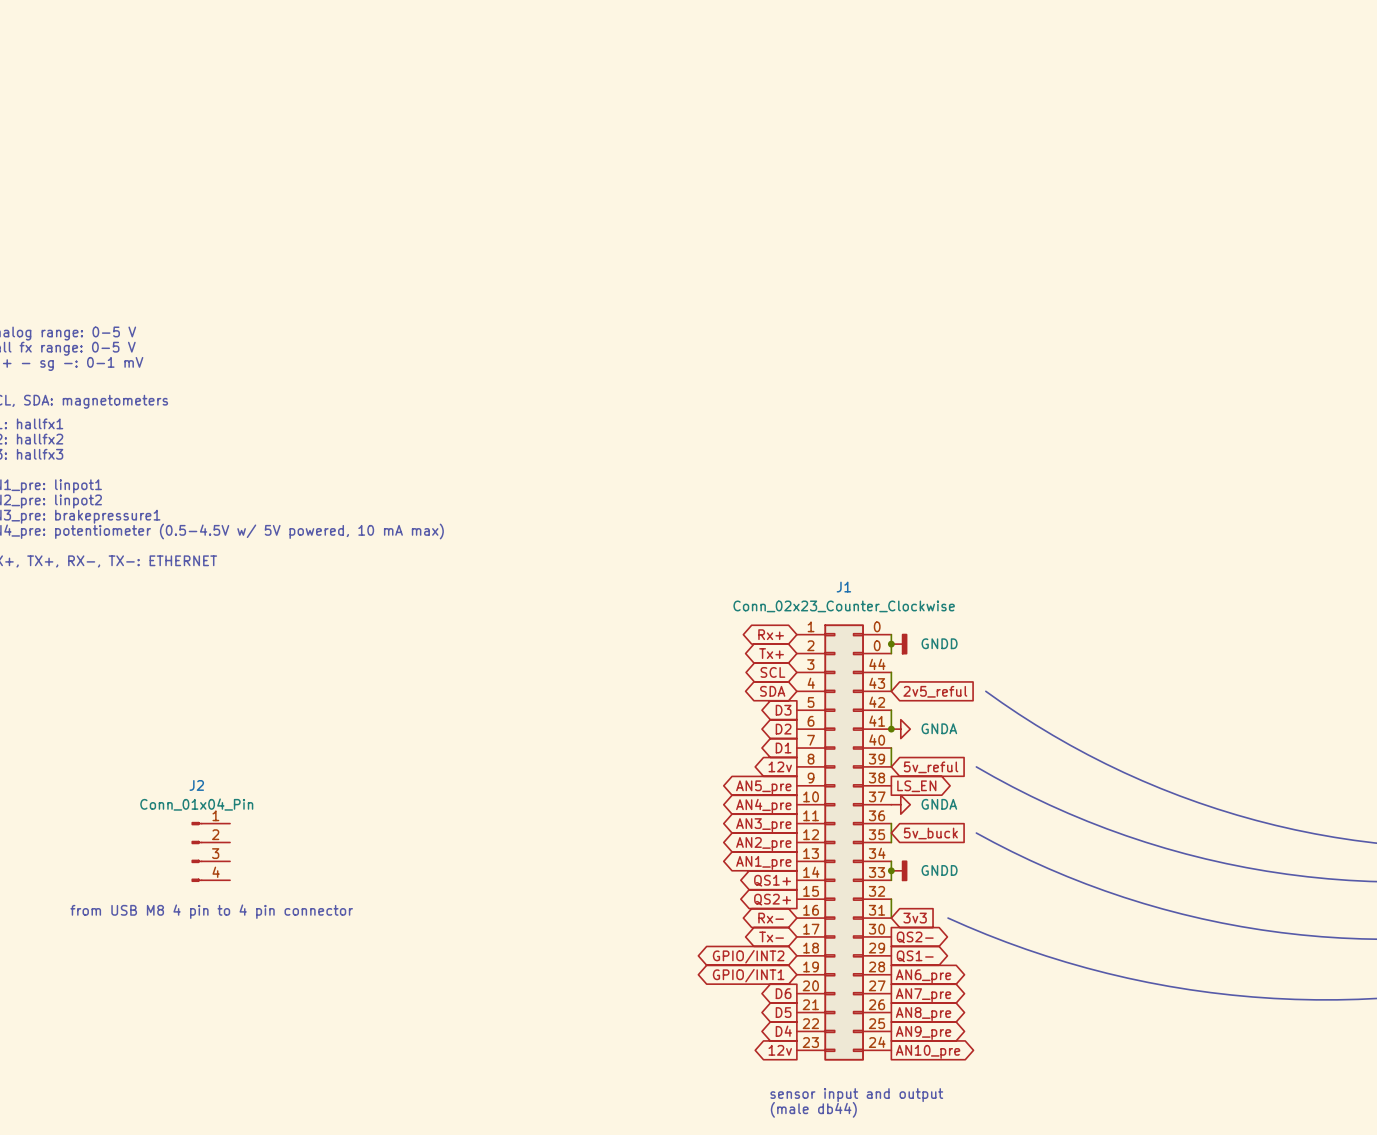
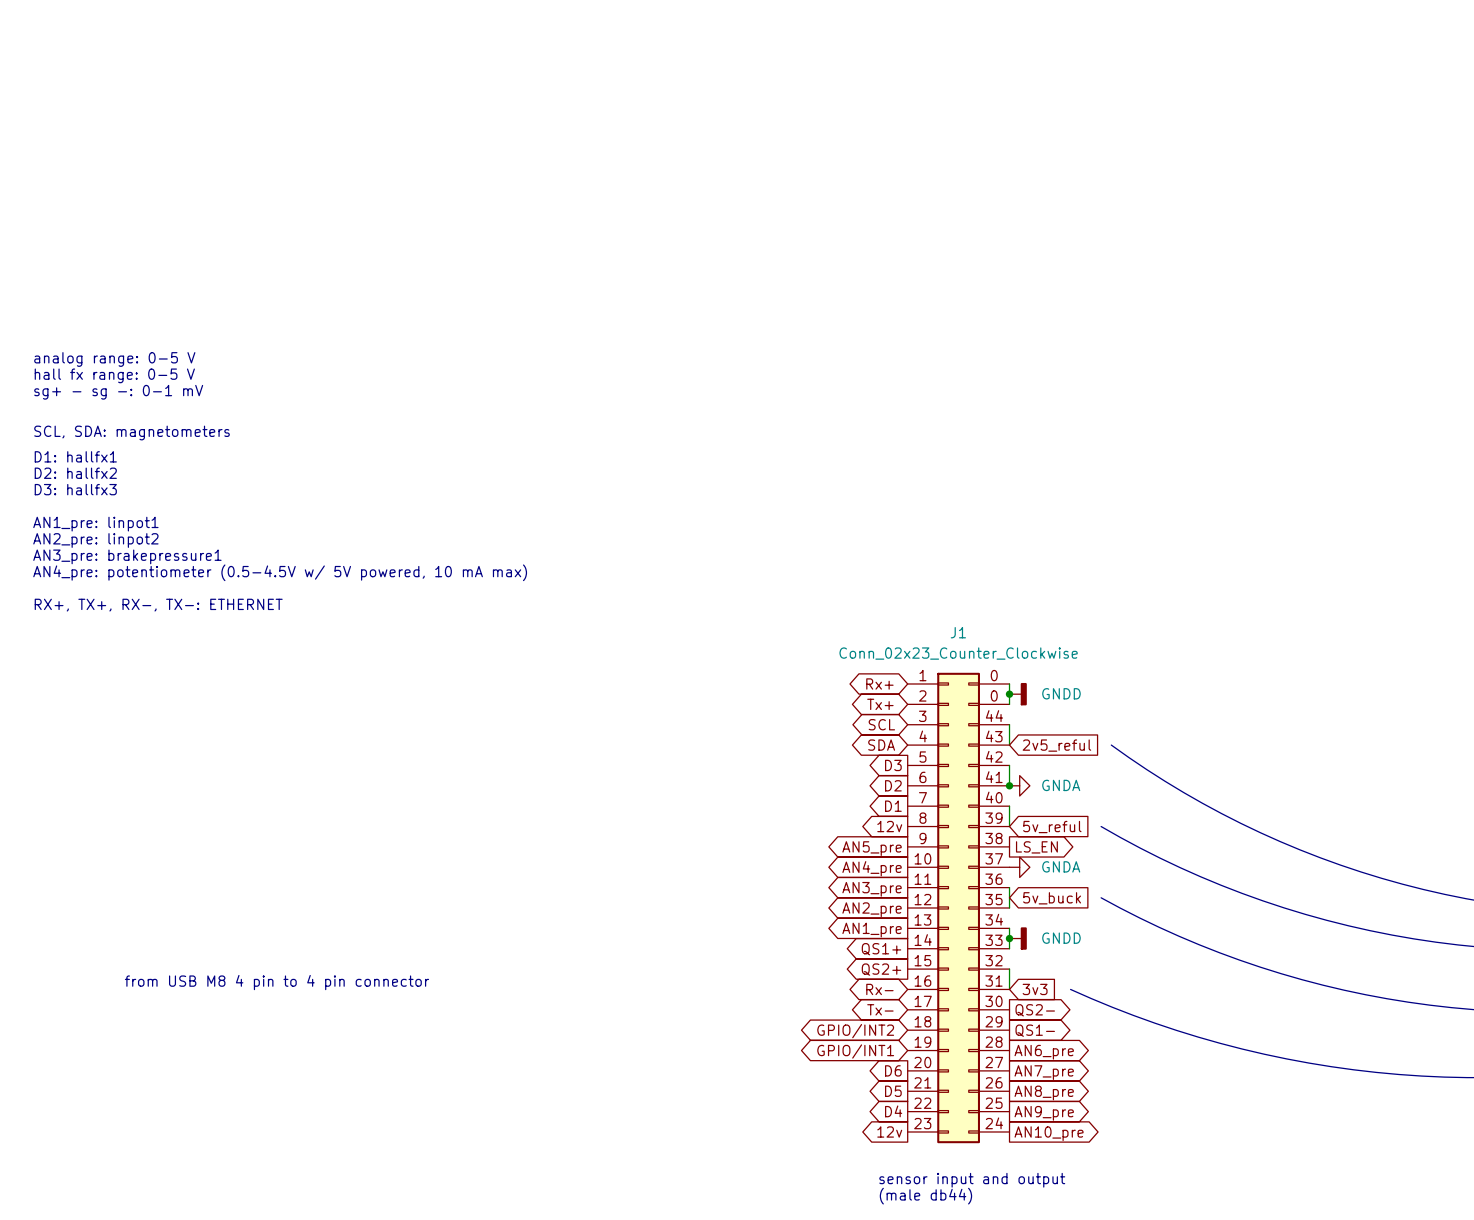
J2: Conn_01x04_Pin (210, 851) -> none

